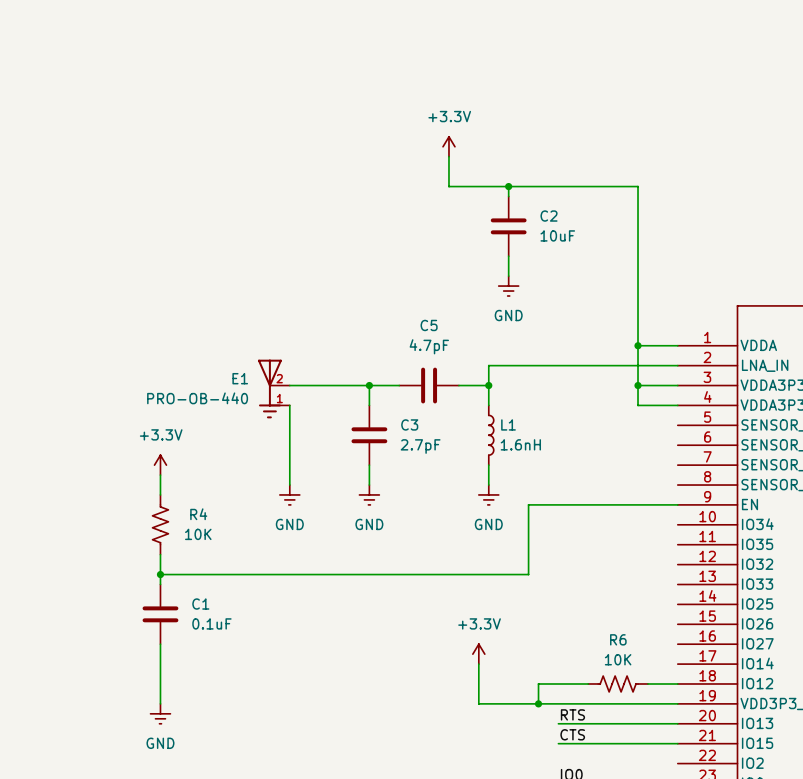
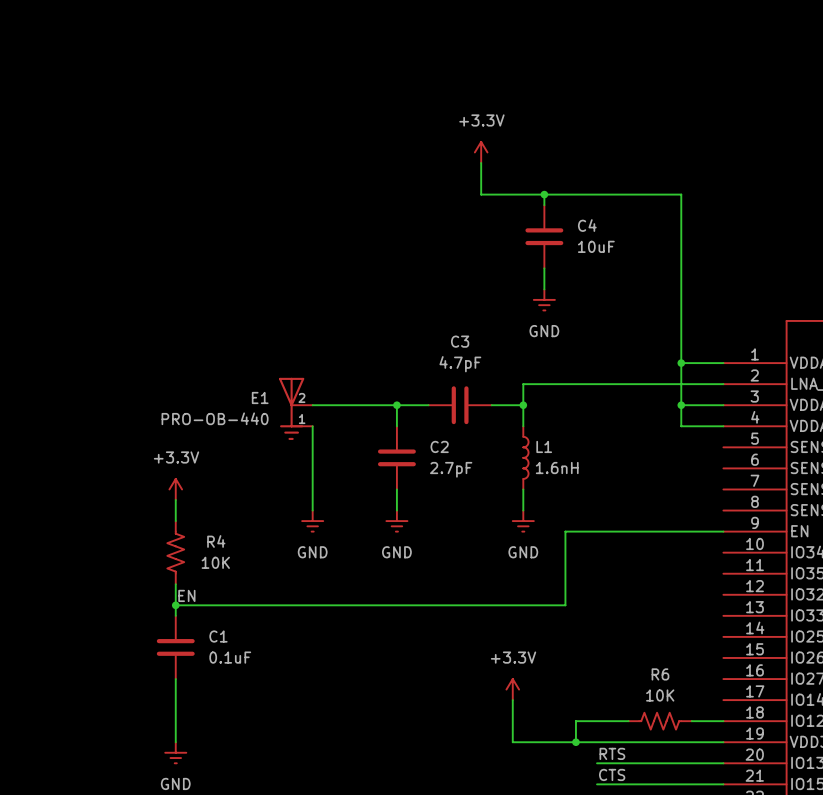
C2 name: C2 (549, 216) -> C4 (587, 225)
C5 name: C5 (429, 325) -> C3 (460, 341)
C3 name: C3 (409, 424) -> C2 (439, 446)
label: none -> EN (186, 595)

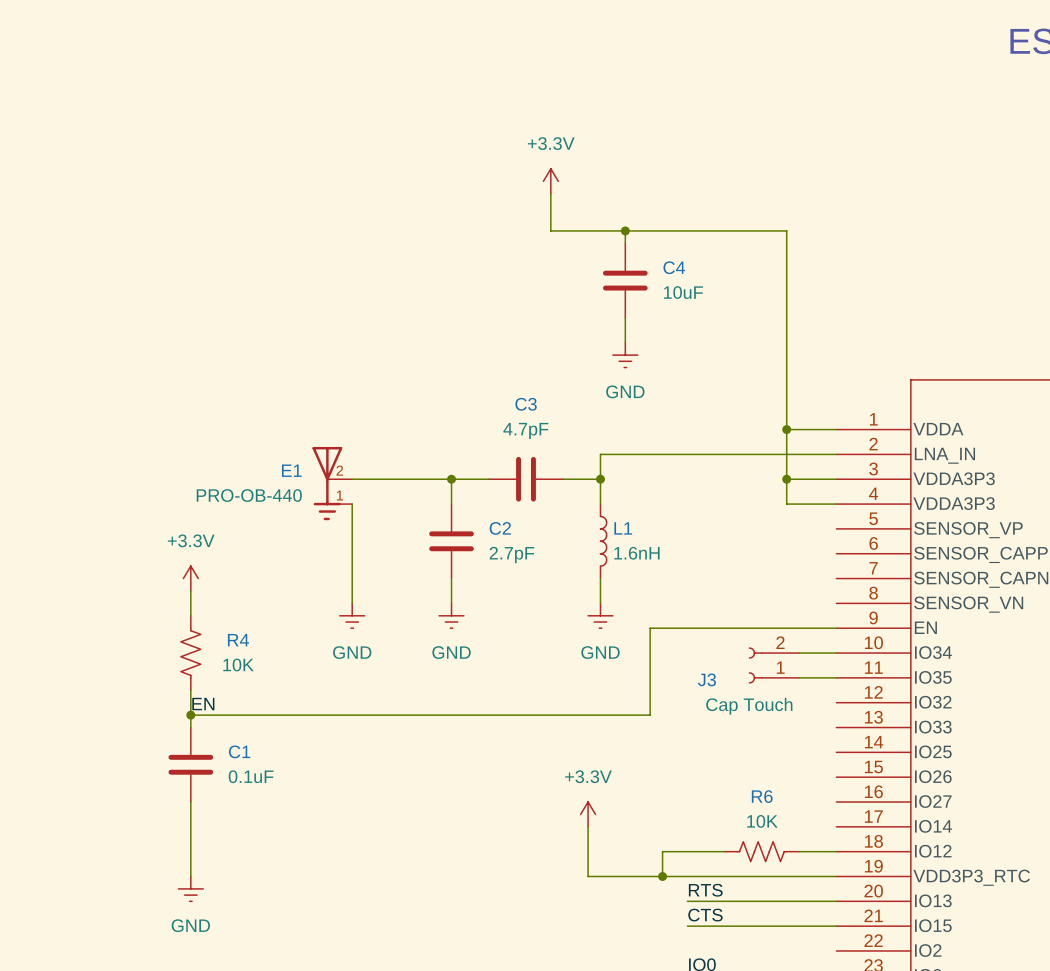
wire: none -> (799, 653) (836, 653)
J3: none -> Cap Touch (773, 665)
wire: none -> (799, 677) (836, 677)

